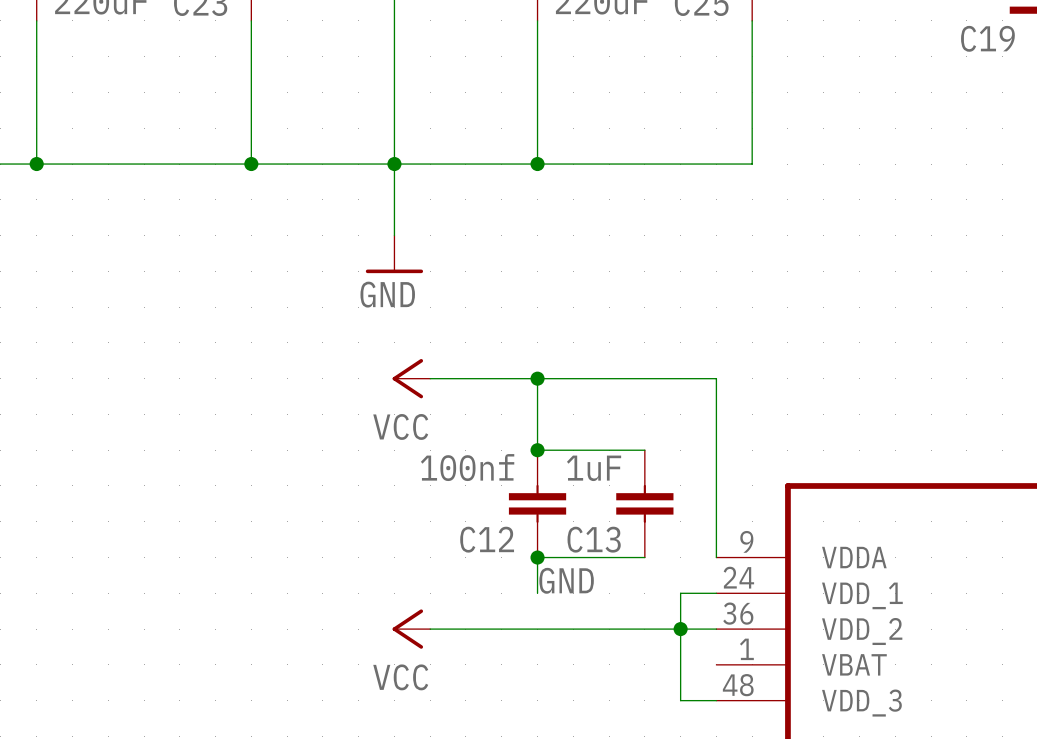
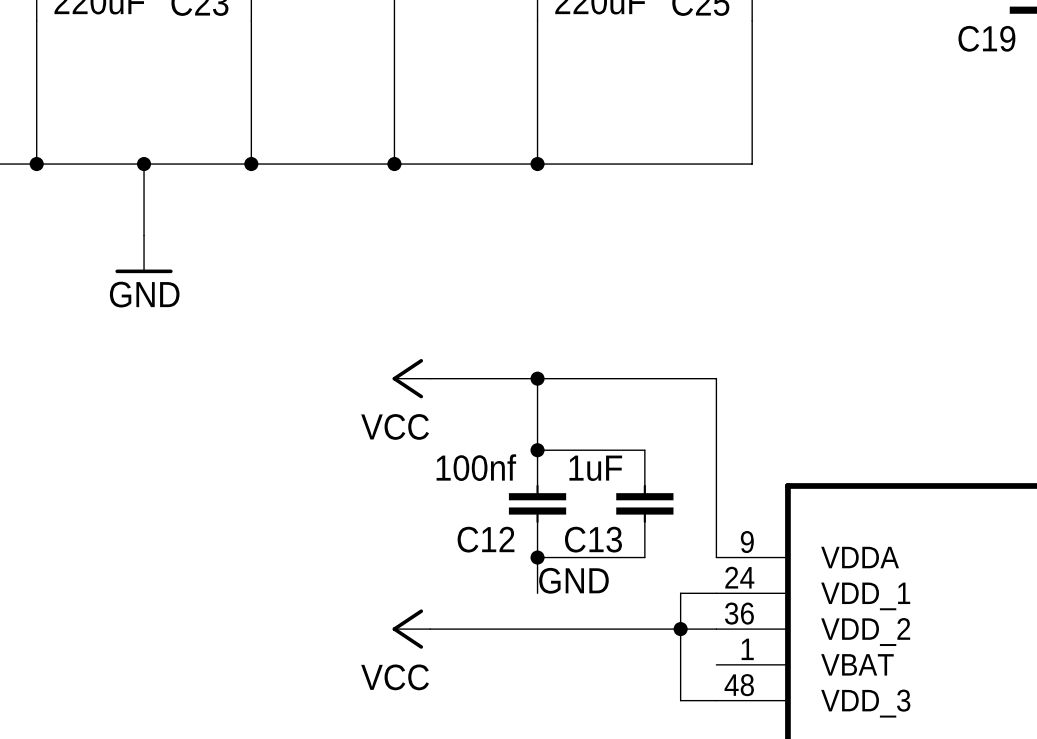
junction: none -> (144, 164)
wire: (394, 164) (394, 235) -> (144, 164) (144, 235)
power symbol position: GND (394, 254) -> GND (144, 254)

